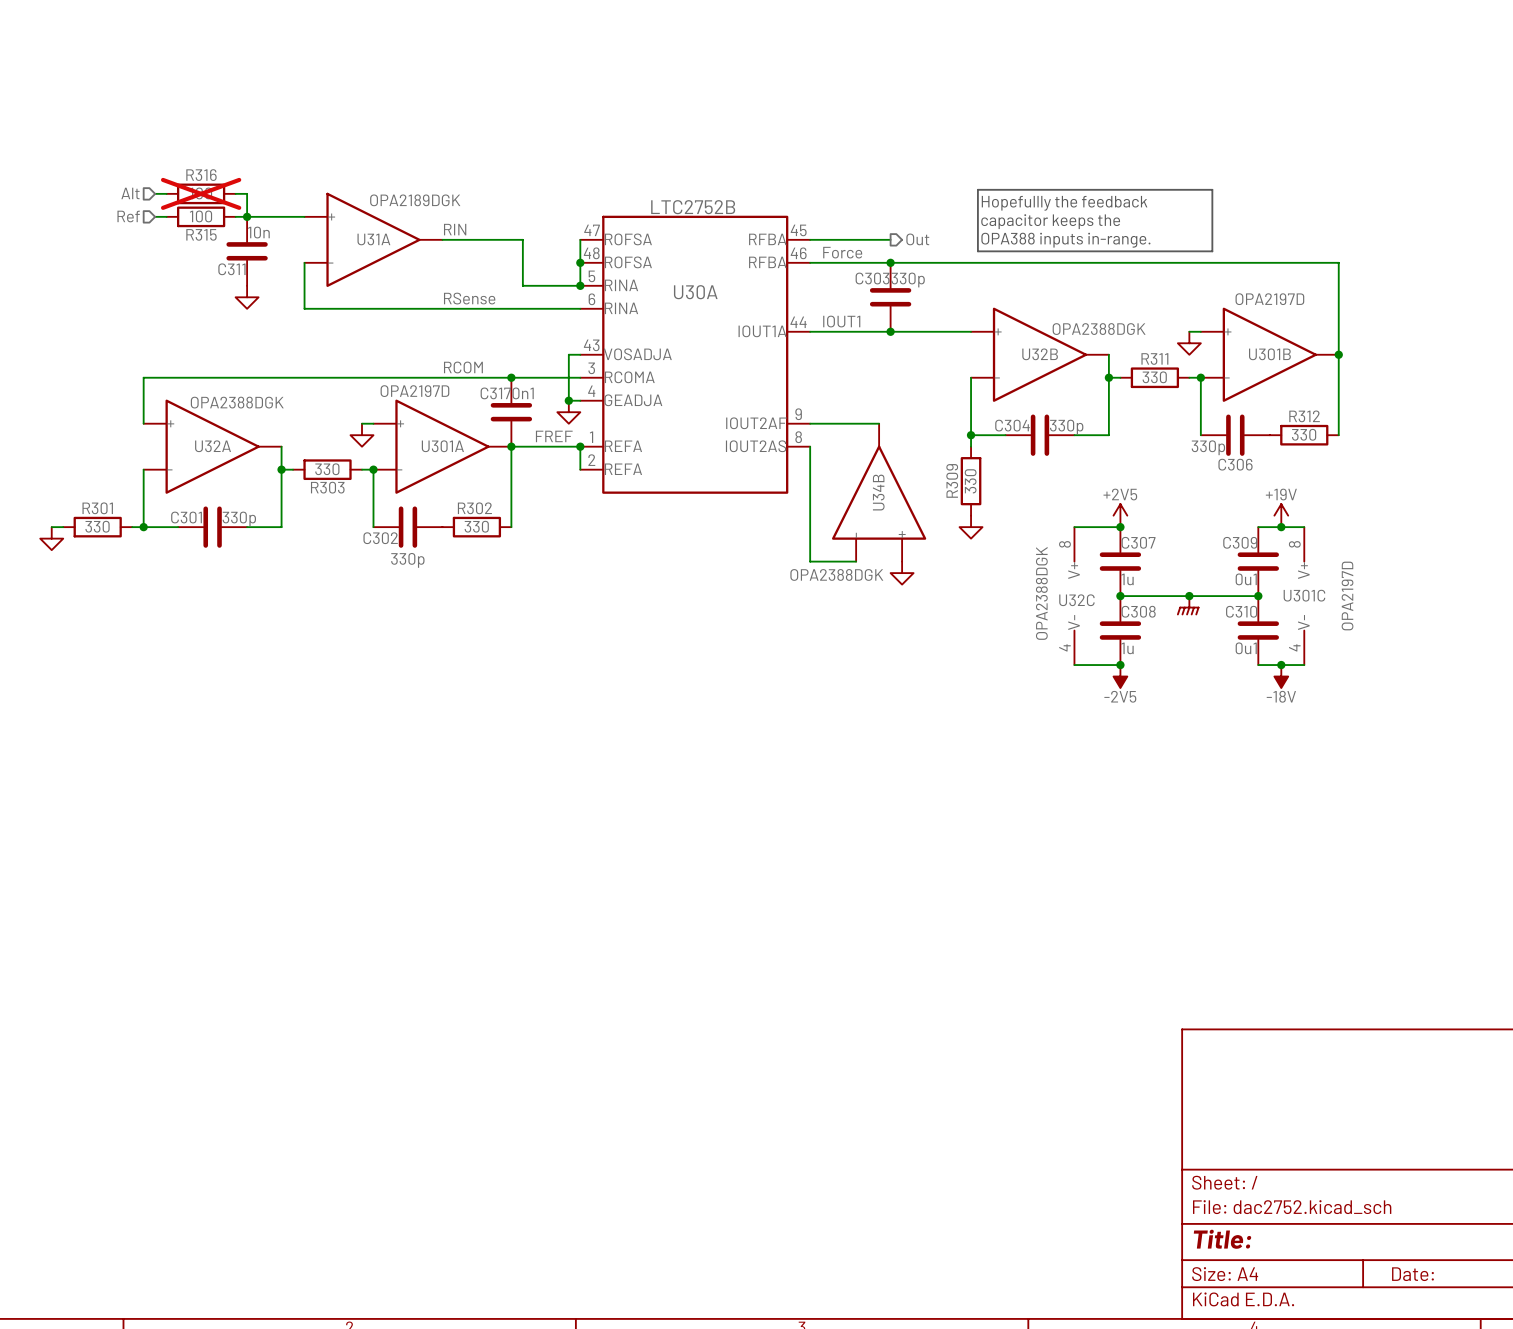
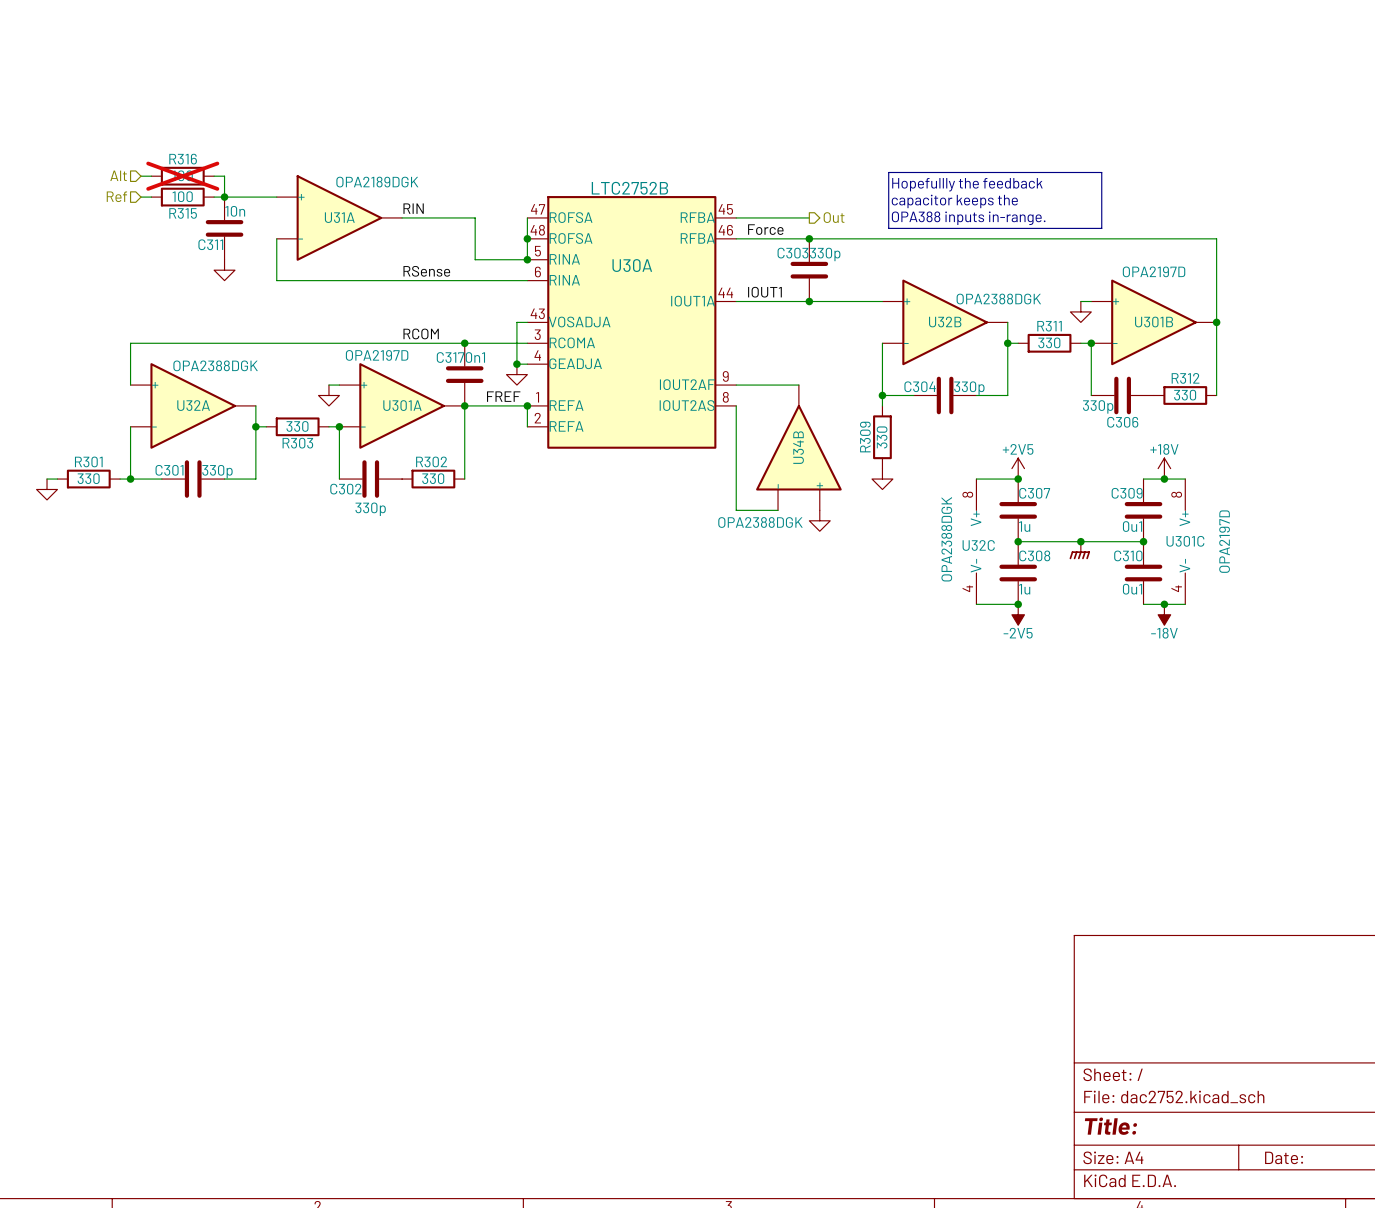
power symbol: +19V (1281, 515) -> +18V (1164, 468)

